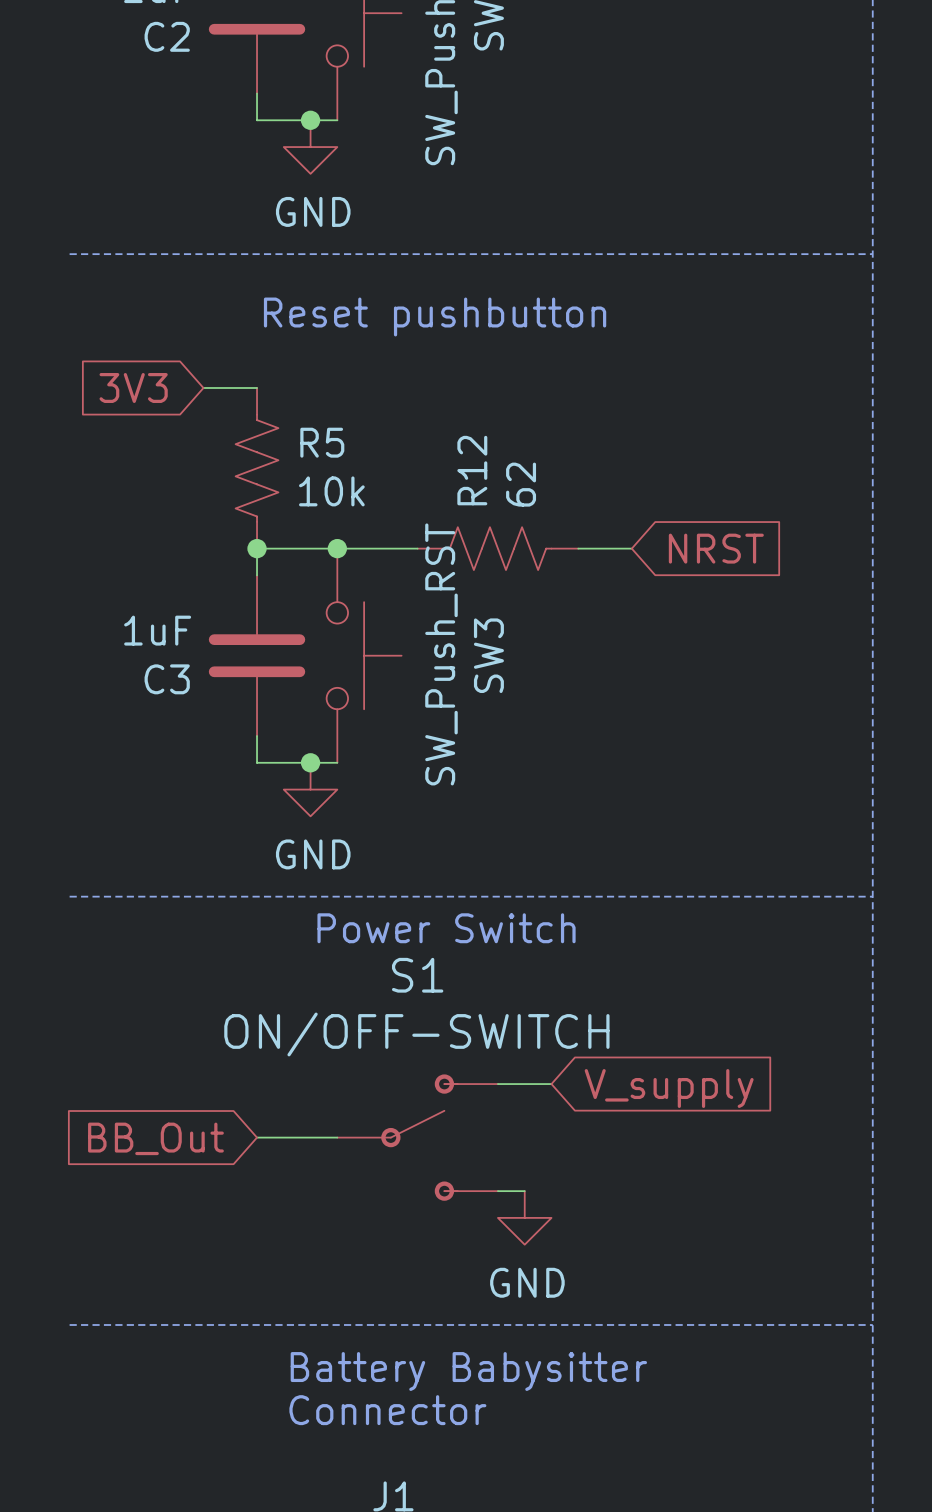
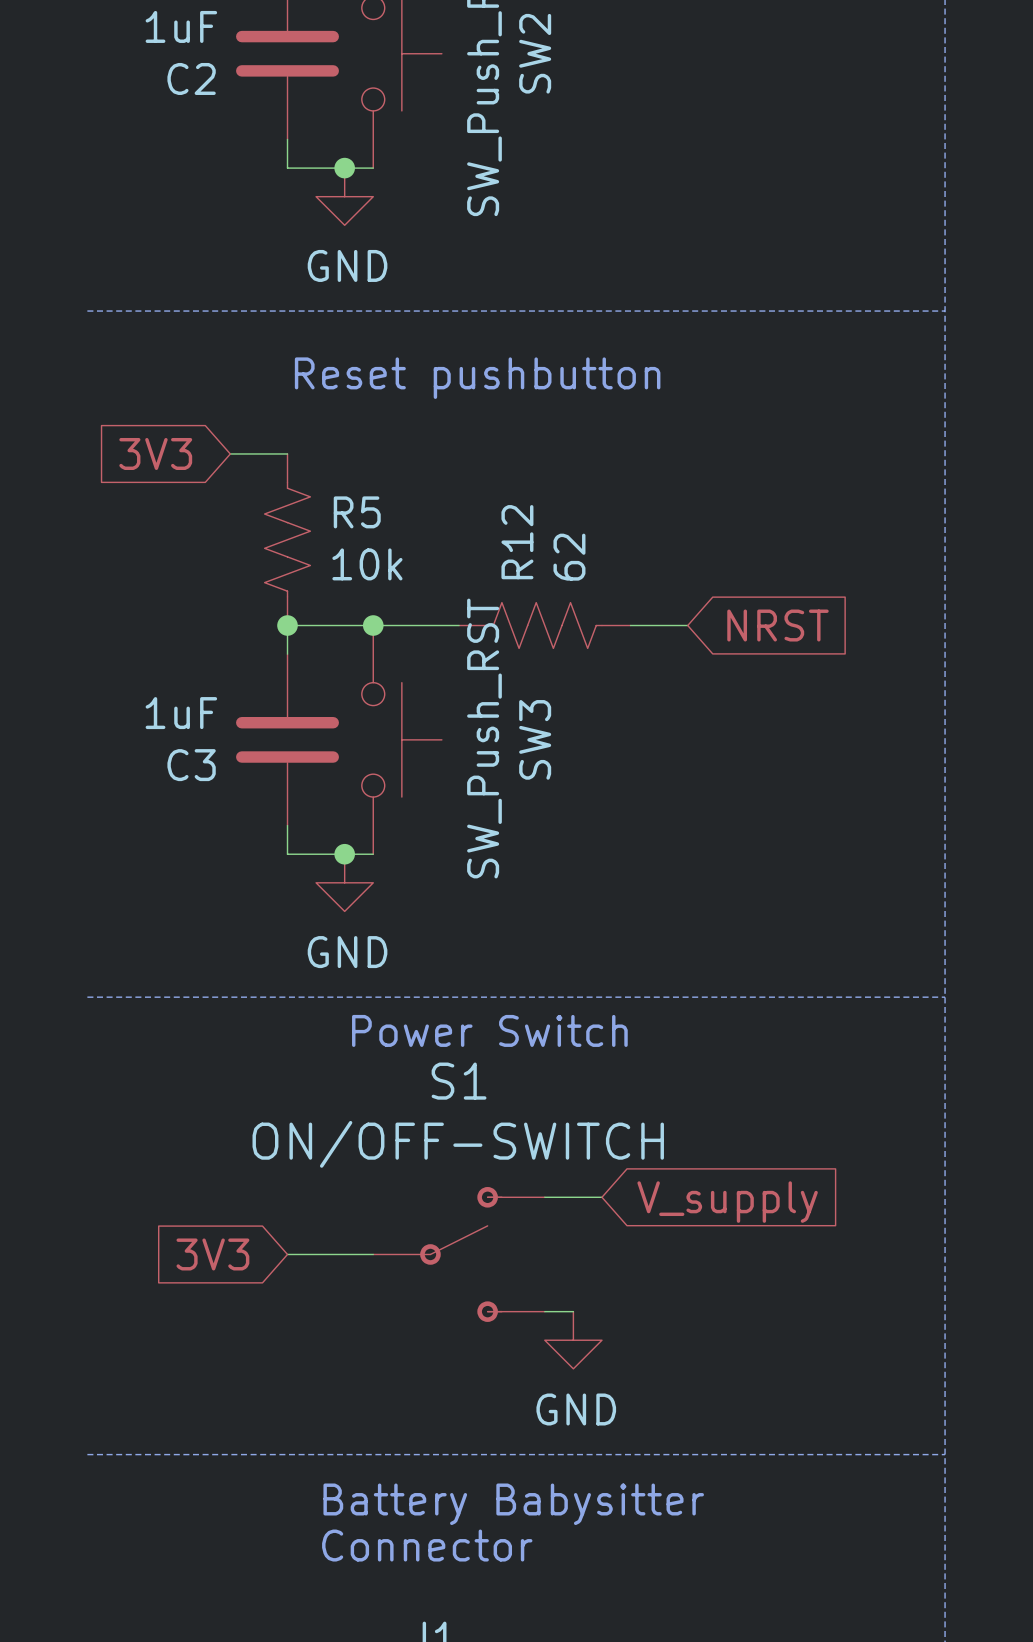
global label: BB_Out (155, 1138) -> 3V3 (212, 1254)

